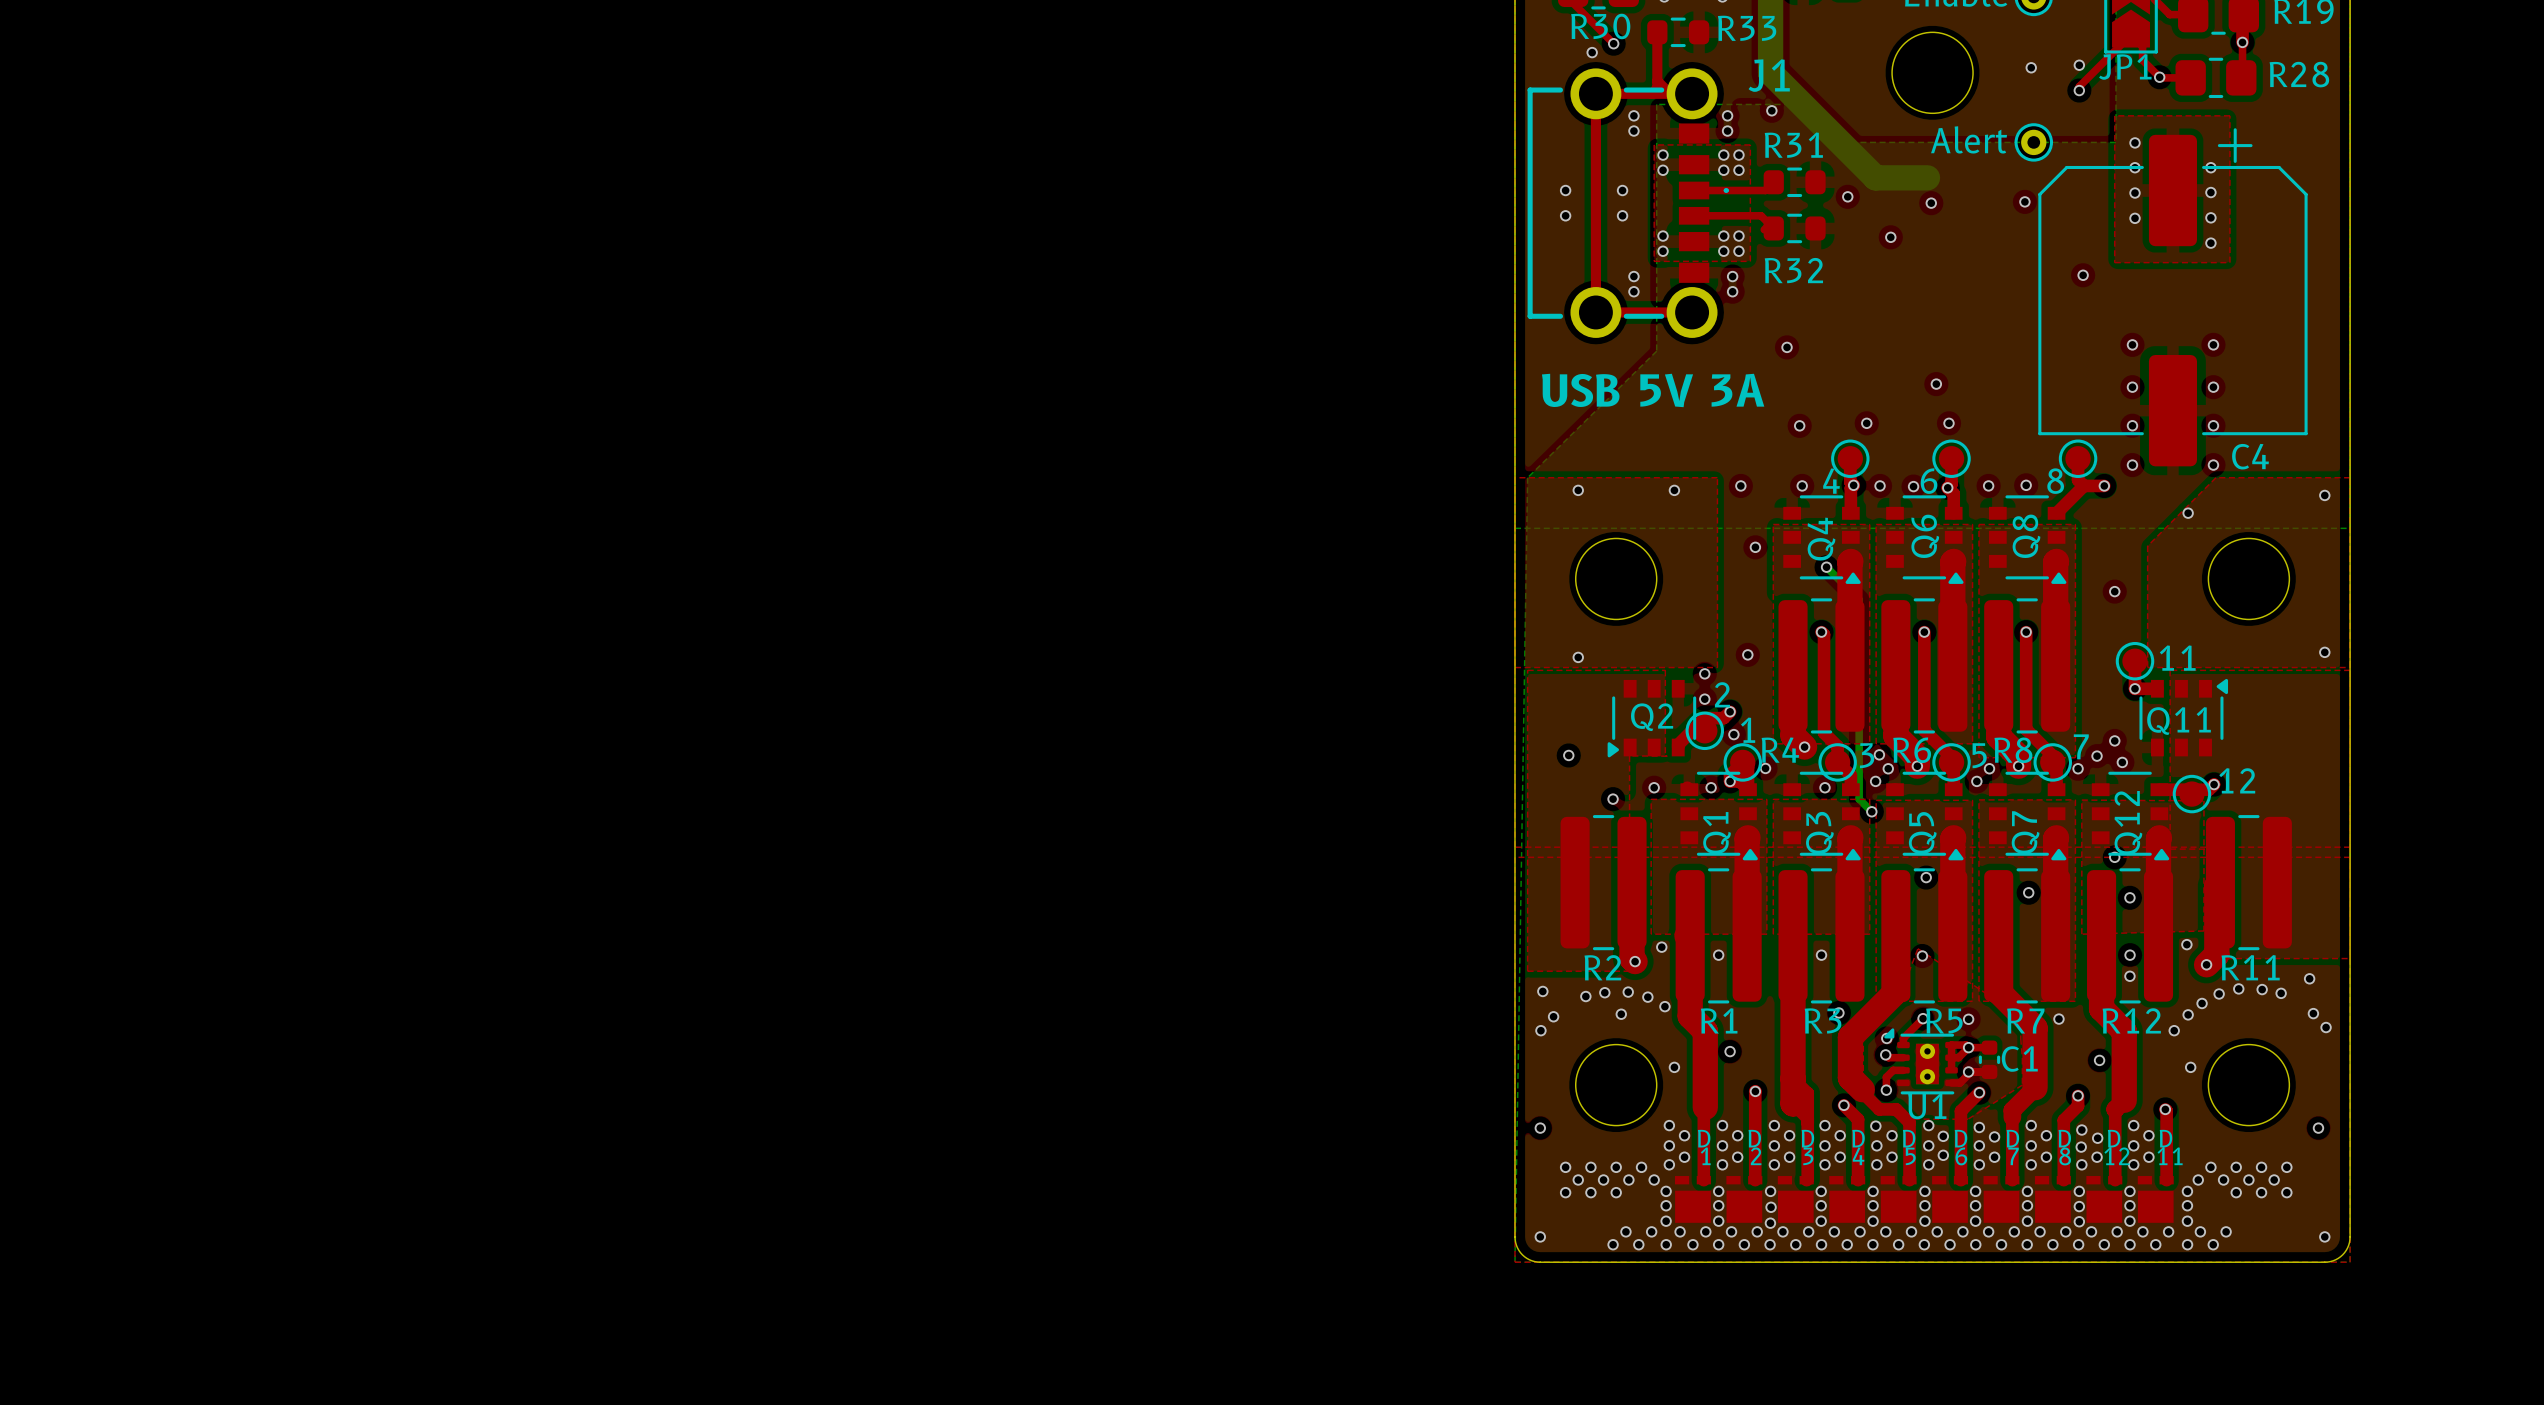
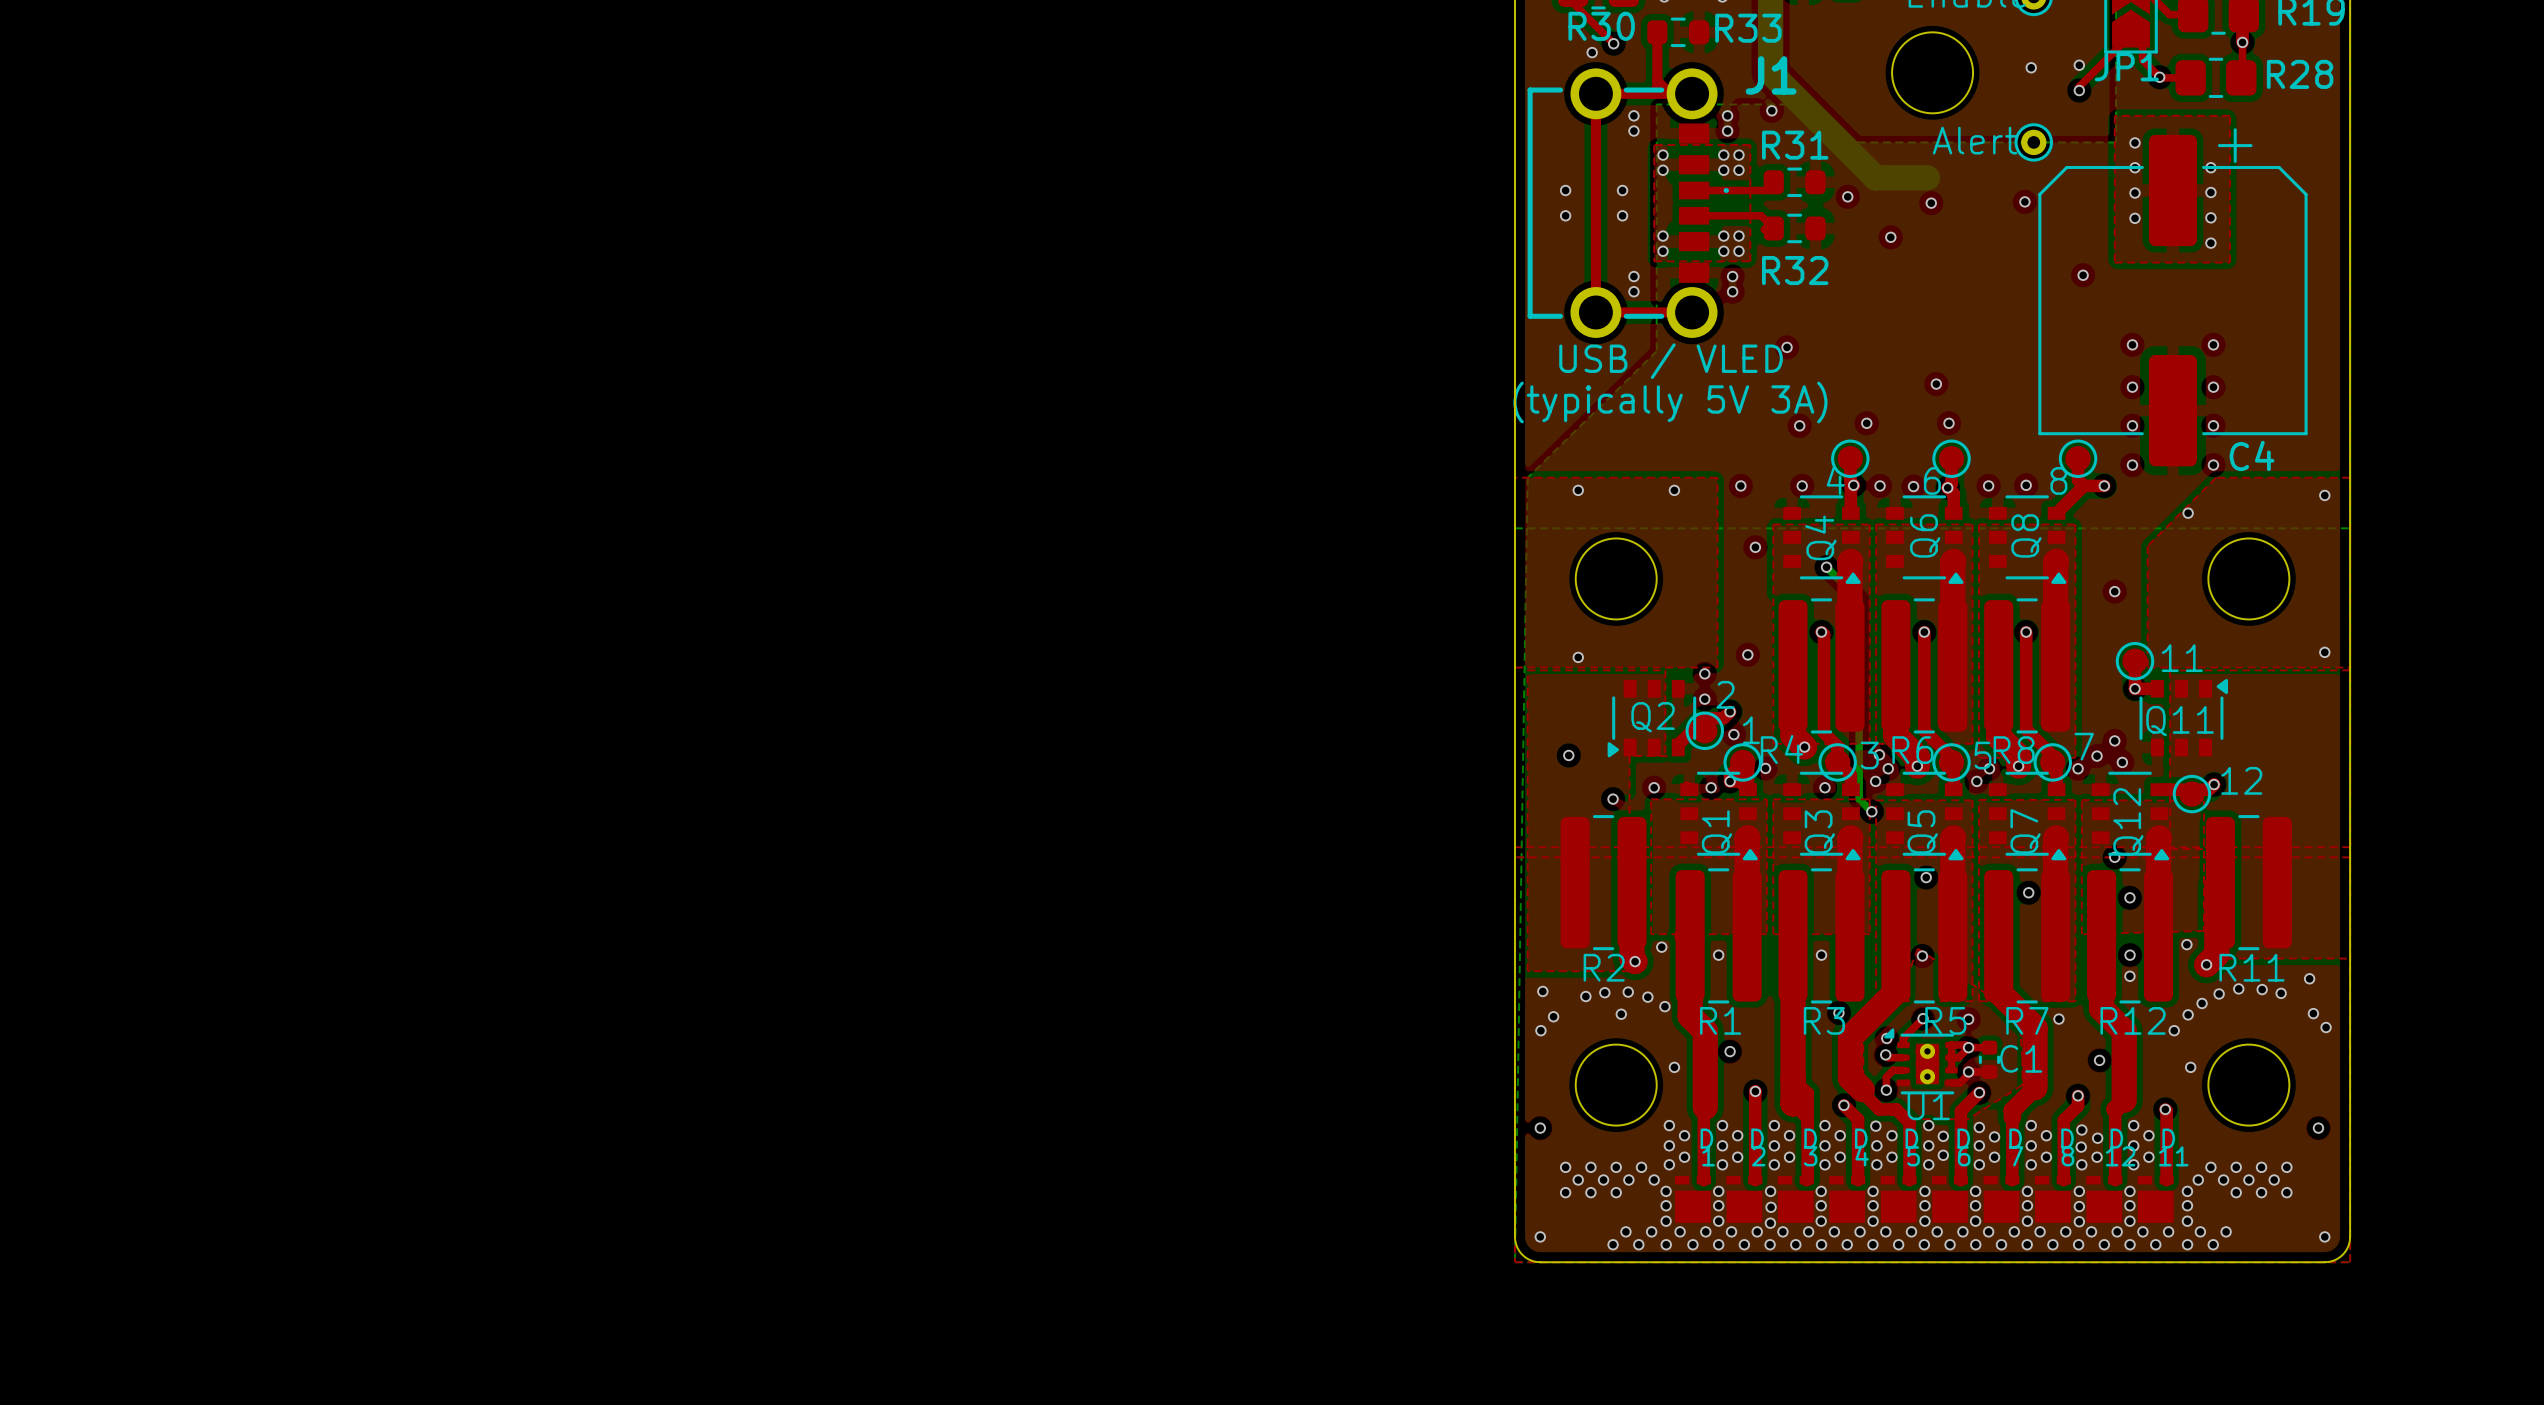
text: none -> USB / VLED (1671, 361)
text: USB 5V 3A (1653, 390) -> none
text: none -> (typically 5V 3A) (1670, 402)

